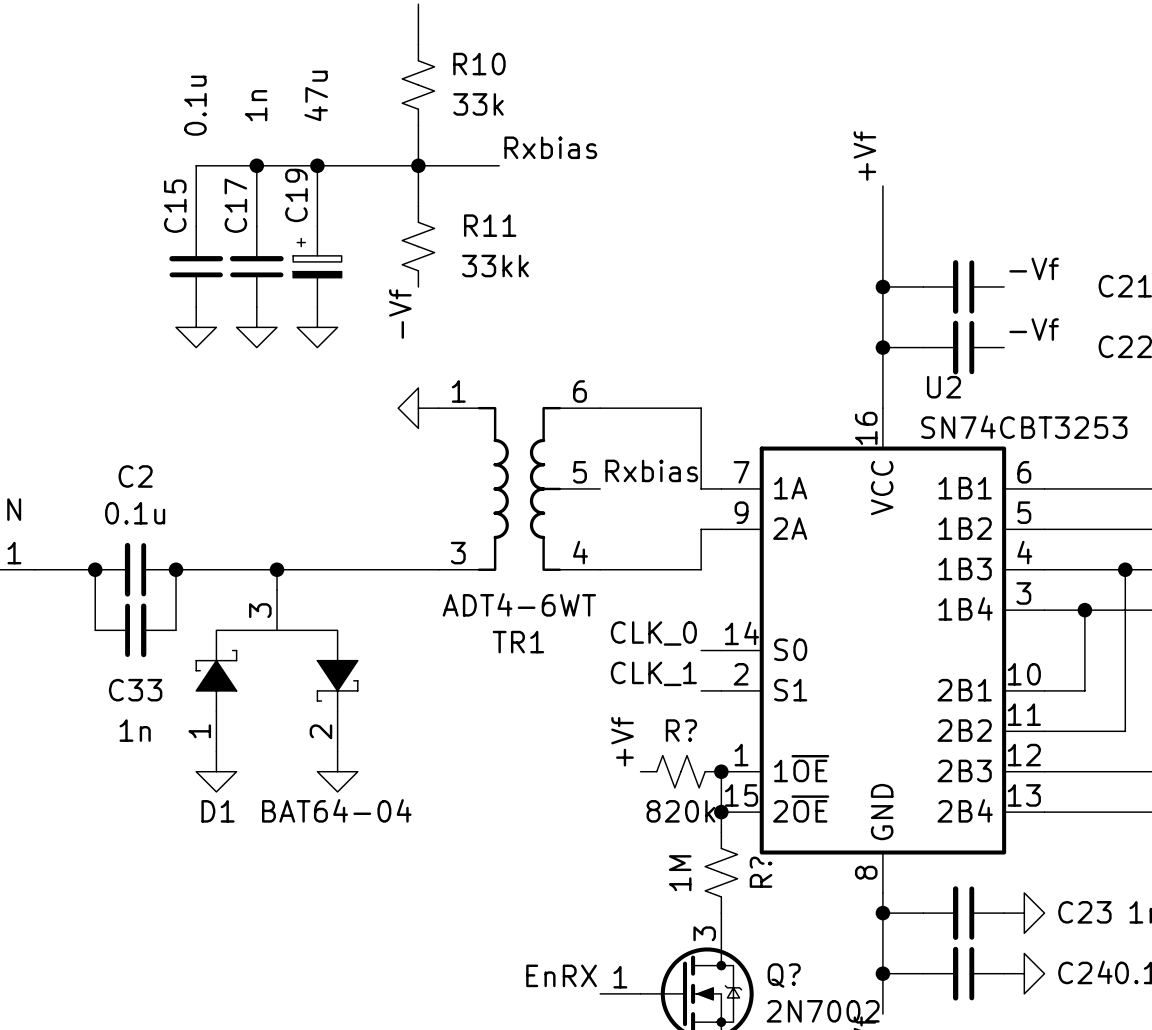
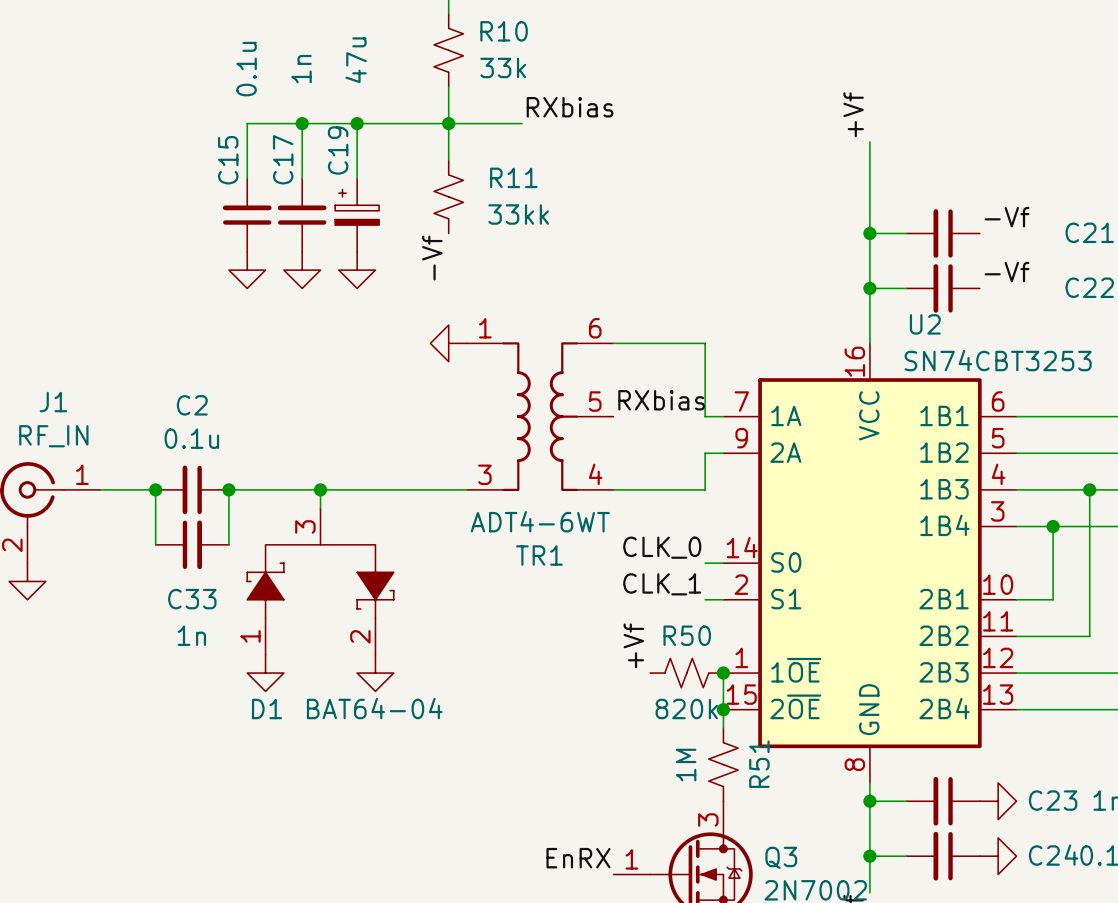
label: Rxbias (550, 147) -> RXbias (570, 107)
label: Rxbias (651, 470) -> RXbias (661, 400)
R? name: R? (681, 730) -> R50 (687, 635)
R? name: R? (760, 872) -> R51 (759, 764)
Q? name: Q? (784, 975) -> Q3 (781, 857)

